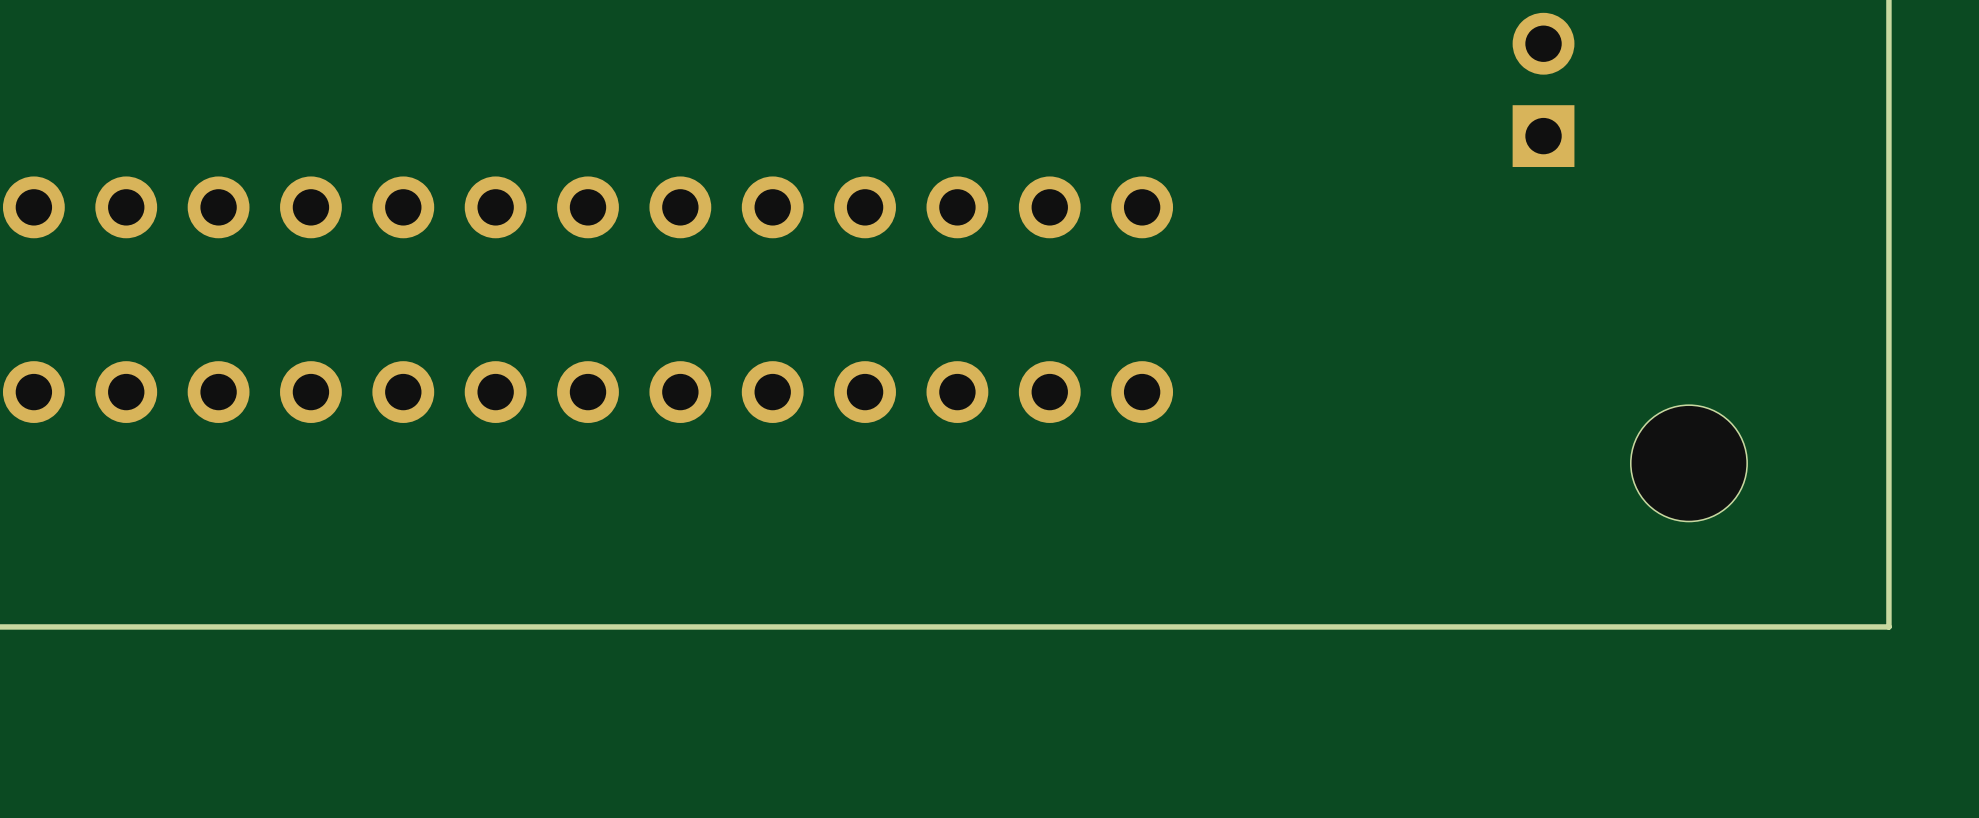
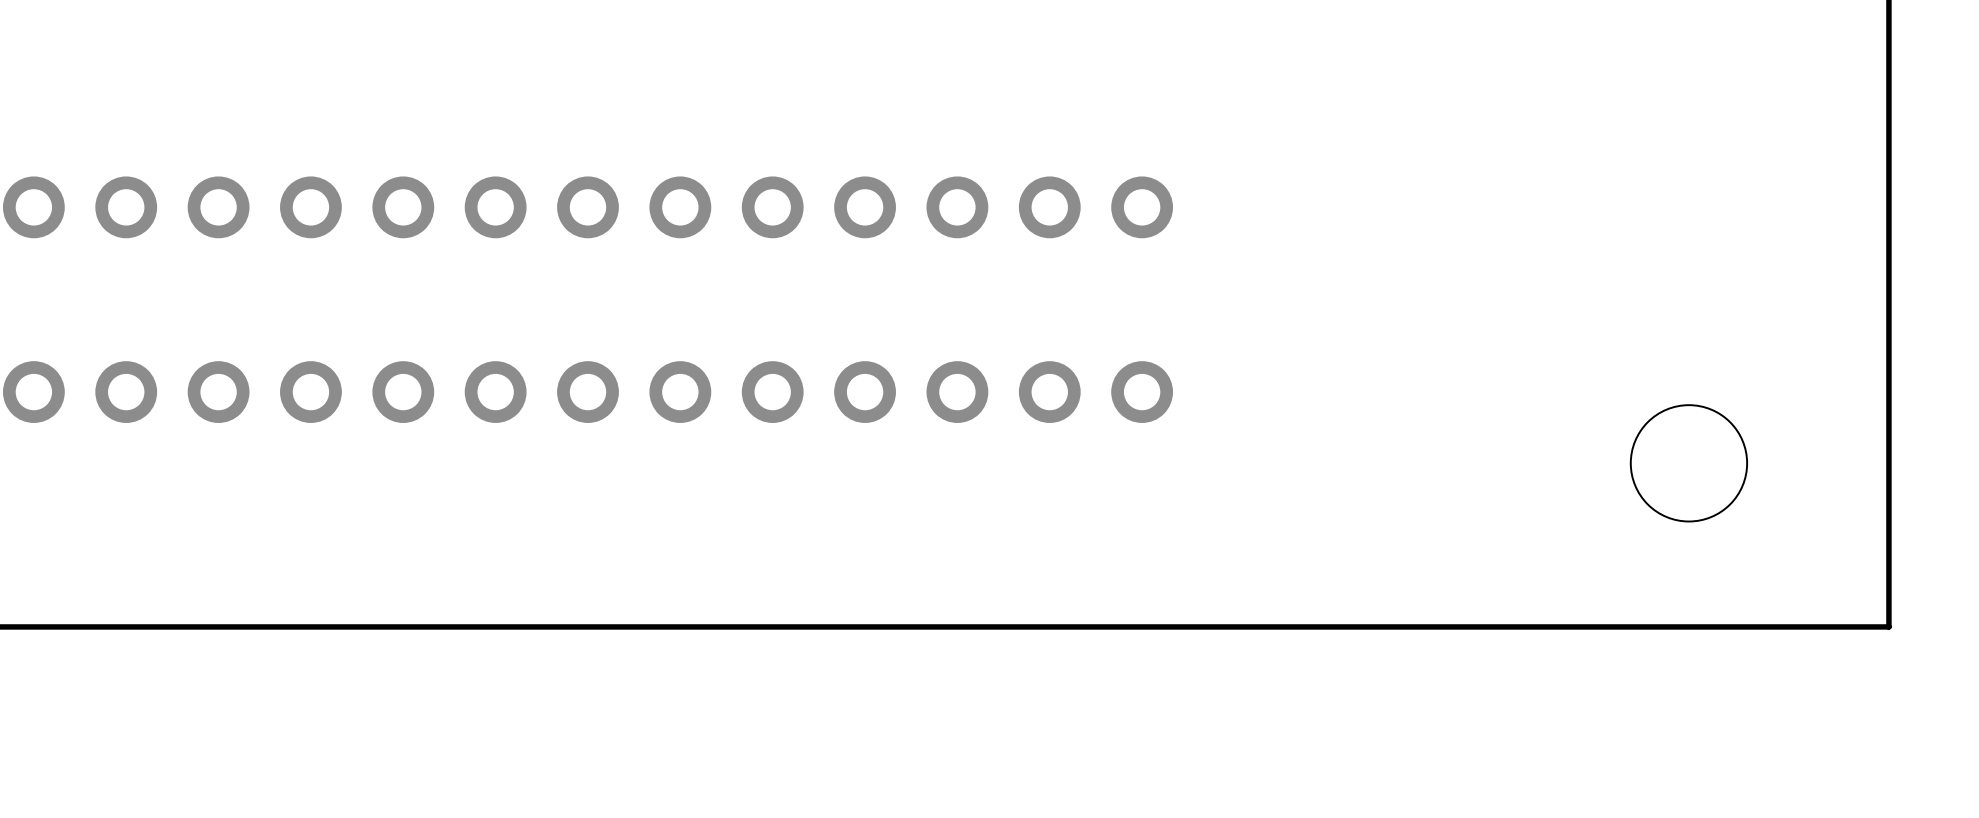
part: (1543, 89) -> none

